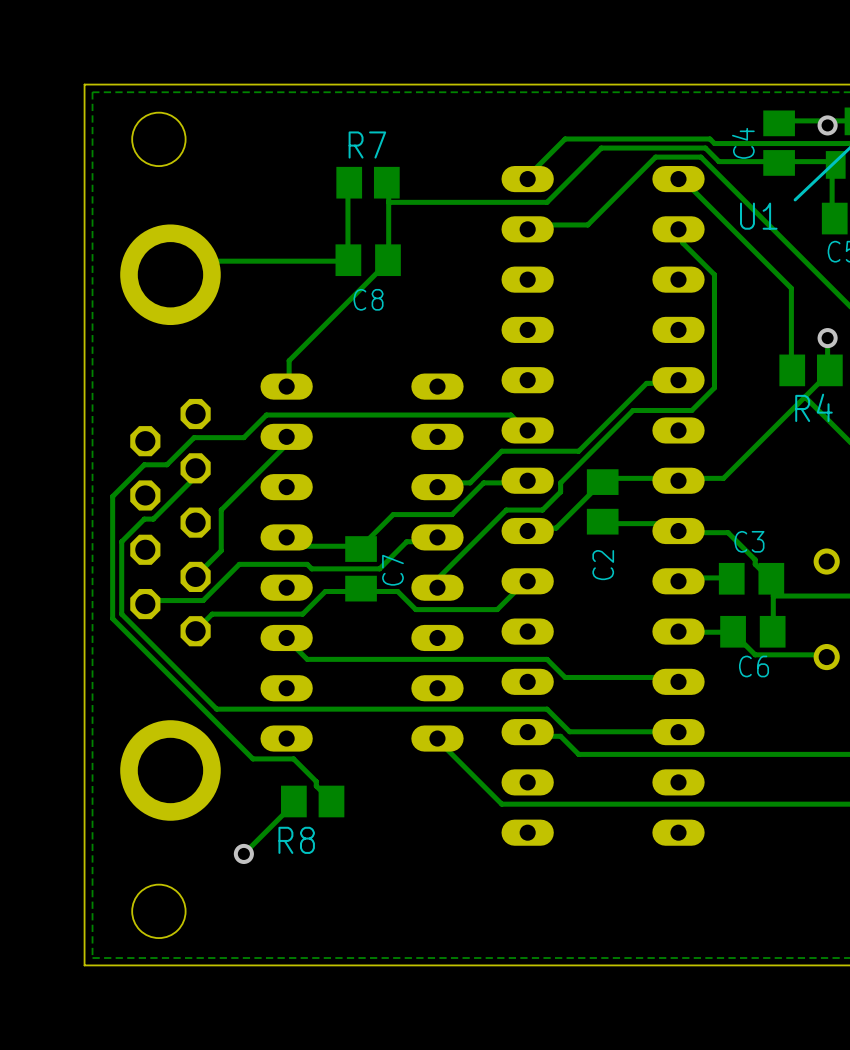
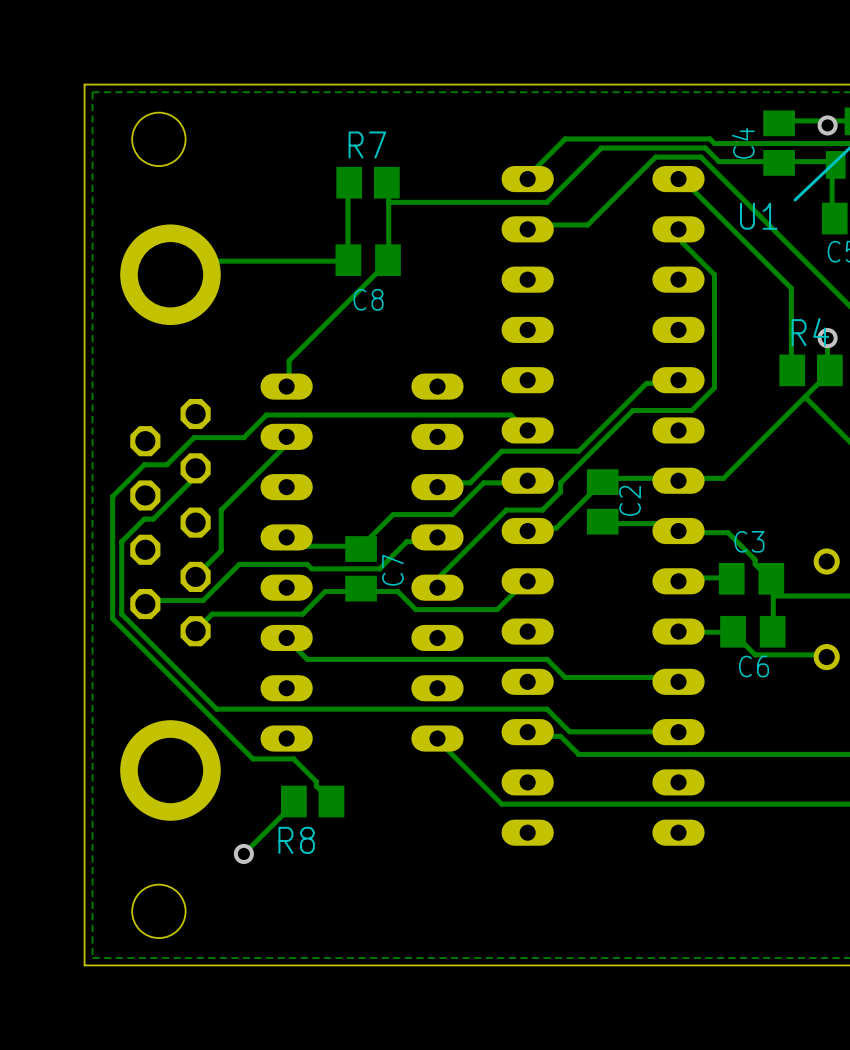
R4 name position: R4 (813, 407) -> R4 (810, 332)
C2 name position: C2 (603, 565) -> C2 (630, 500)

